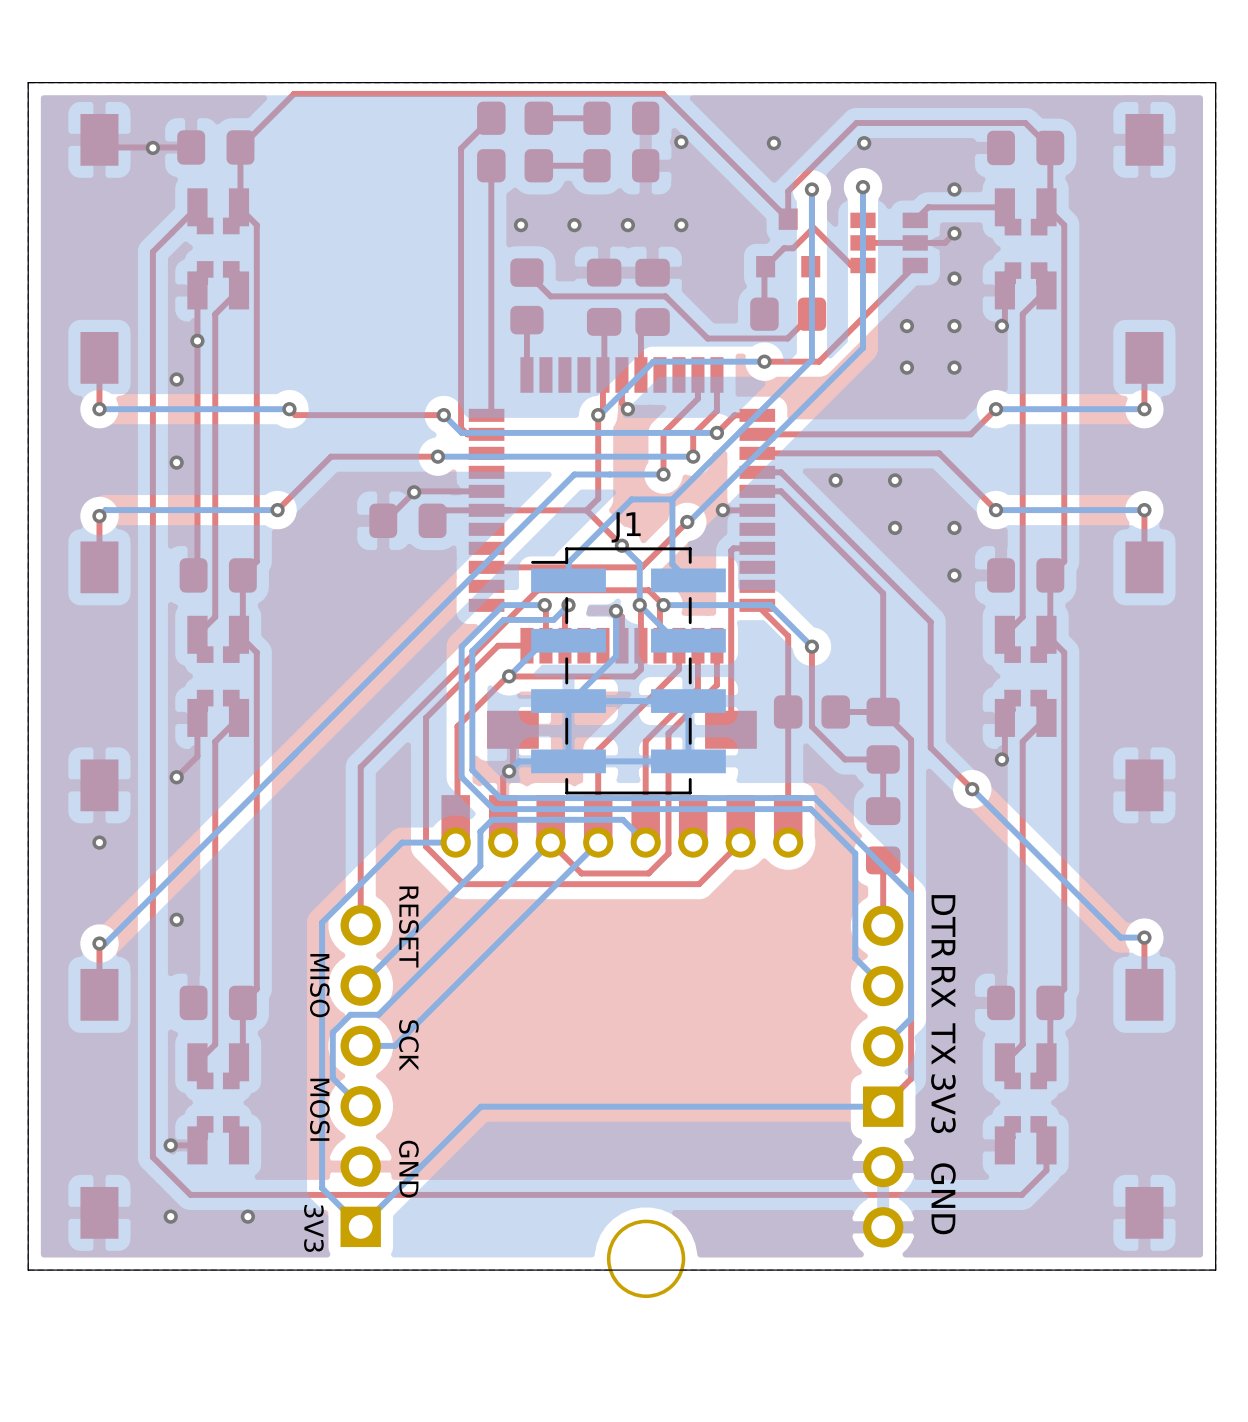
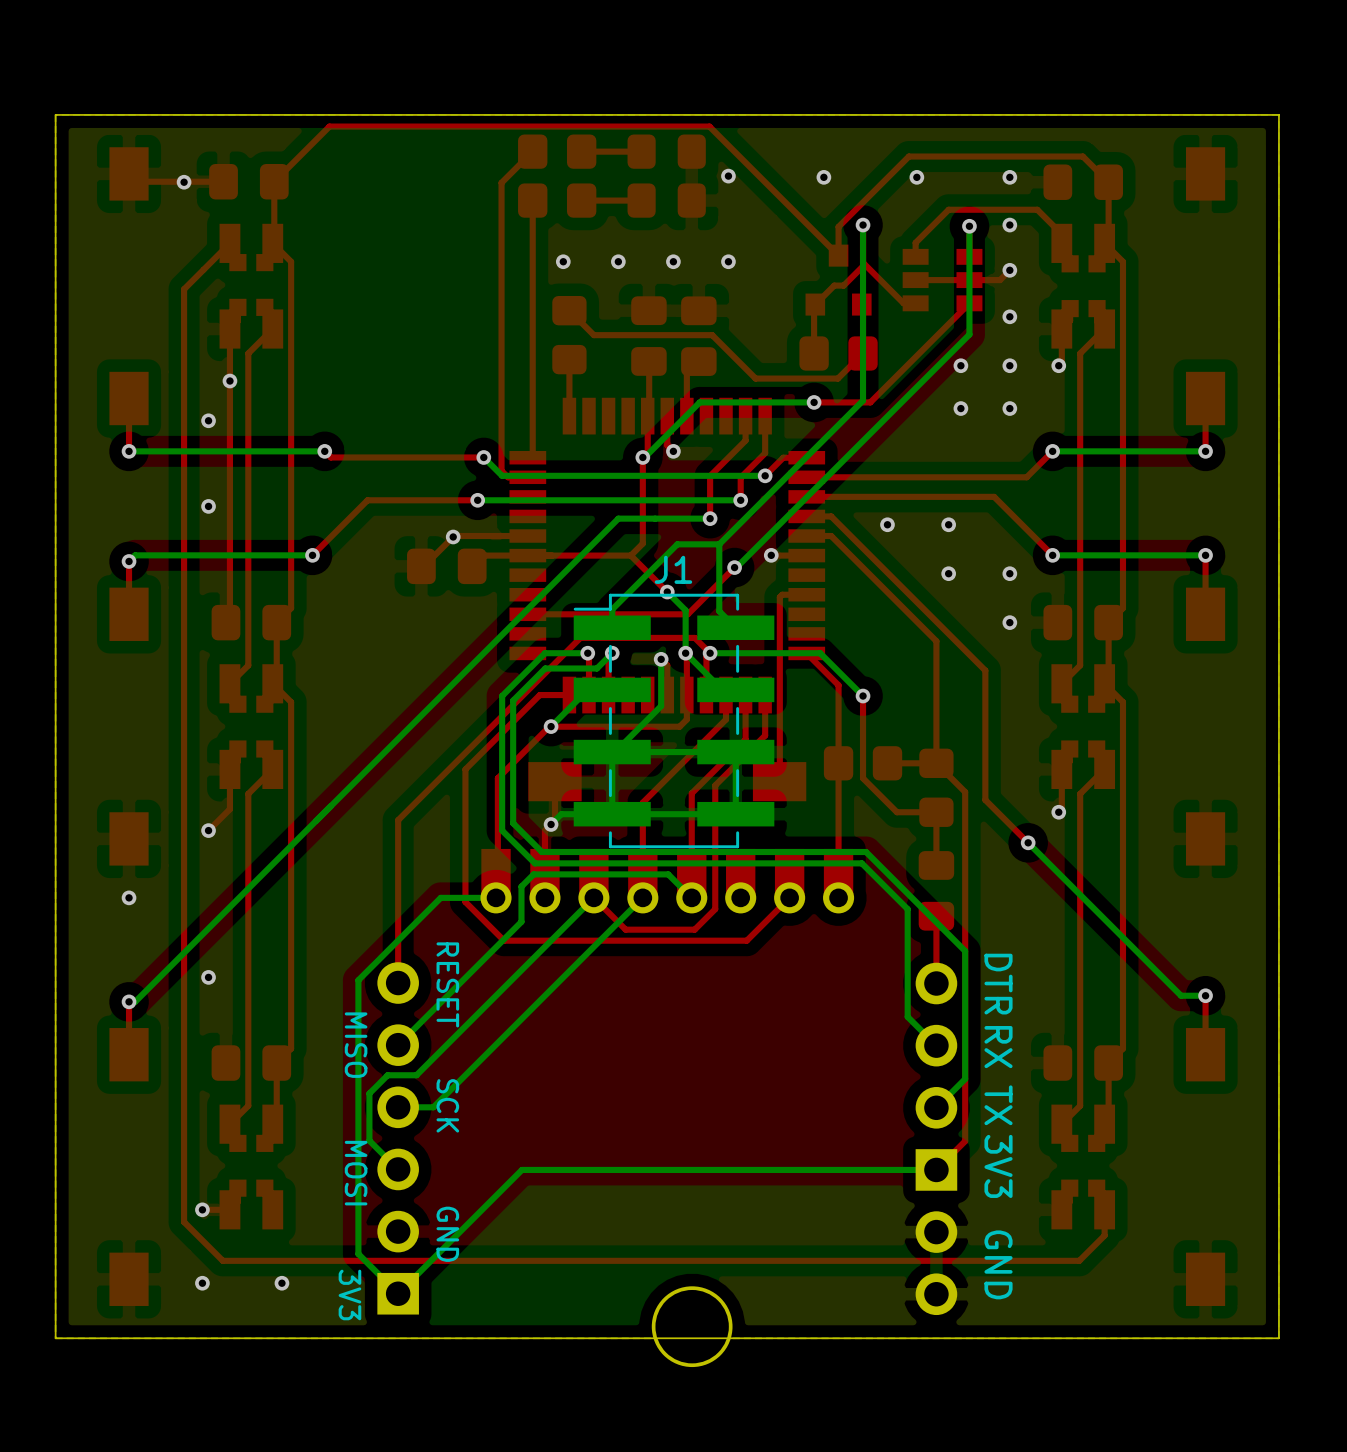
via: none -> (1009, 177)
bottom track: (863, 187) (863, 348) -> (969, 226) (969, 334) (915, 388)
via: (863, 187) -> none
via: none -> (969, 226)
top track: (1004, 207) (928, 207) (915, 220) -> (1061, 243) (1061, 234) (1037, 209) (948, 209) (915, 242)

